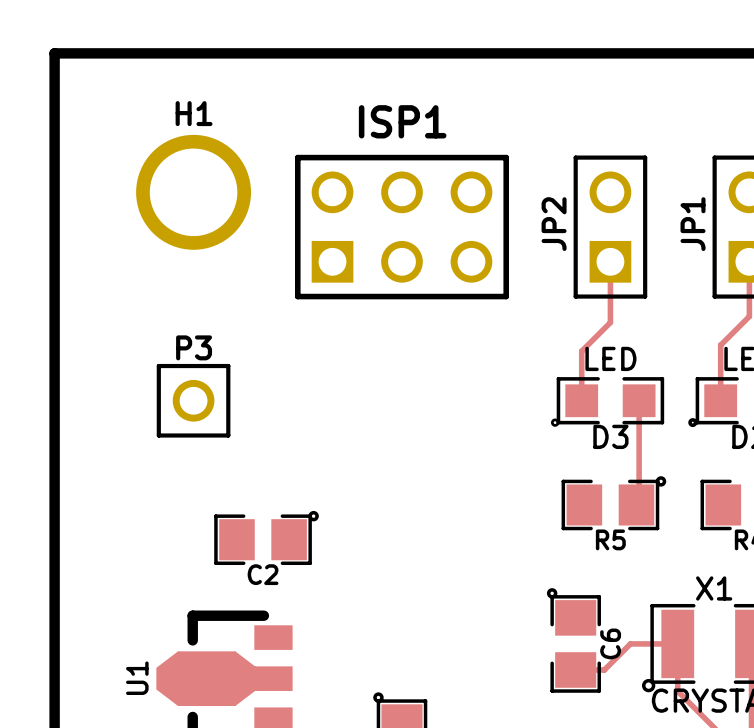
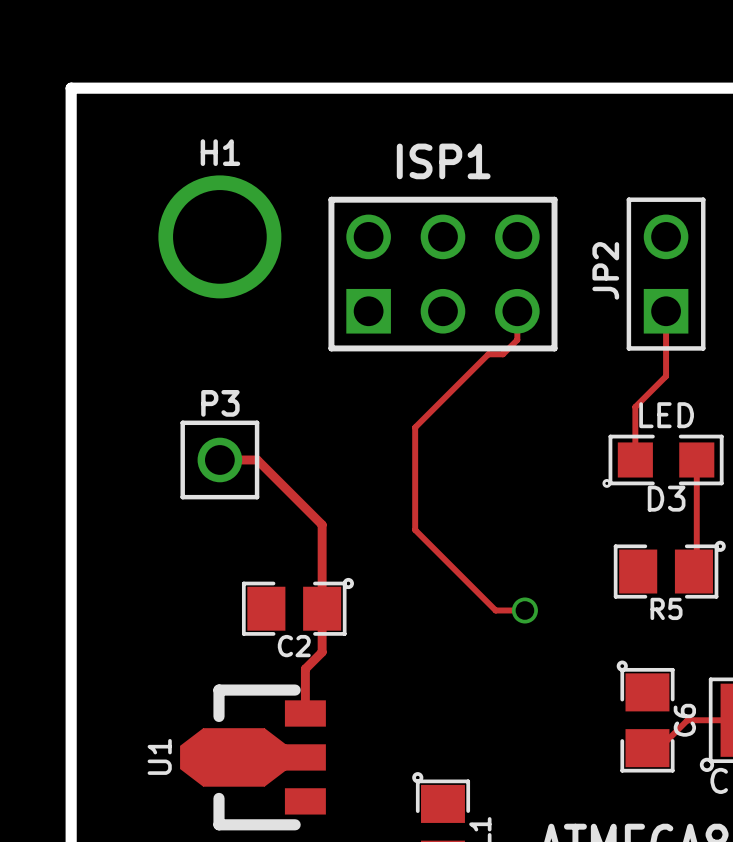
top track: none -> (517, 311) (517, 339) (502, 354) (488, 354) (415, 427) (415, 529) (495, 610) (524, 610)
top track: none -> (219, 459) (257, 459) (322, 524) (322, 652) (305, 668) (305, 713)
via: none -> (524, 610)
C6 position: (573, 640) -> (645, 716)

